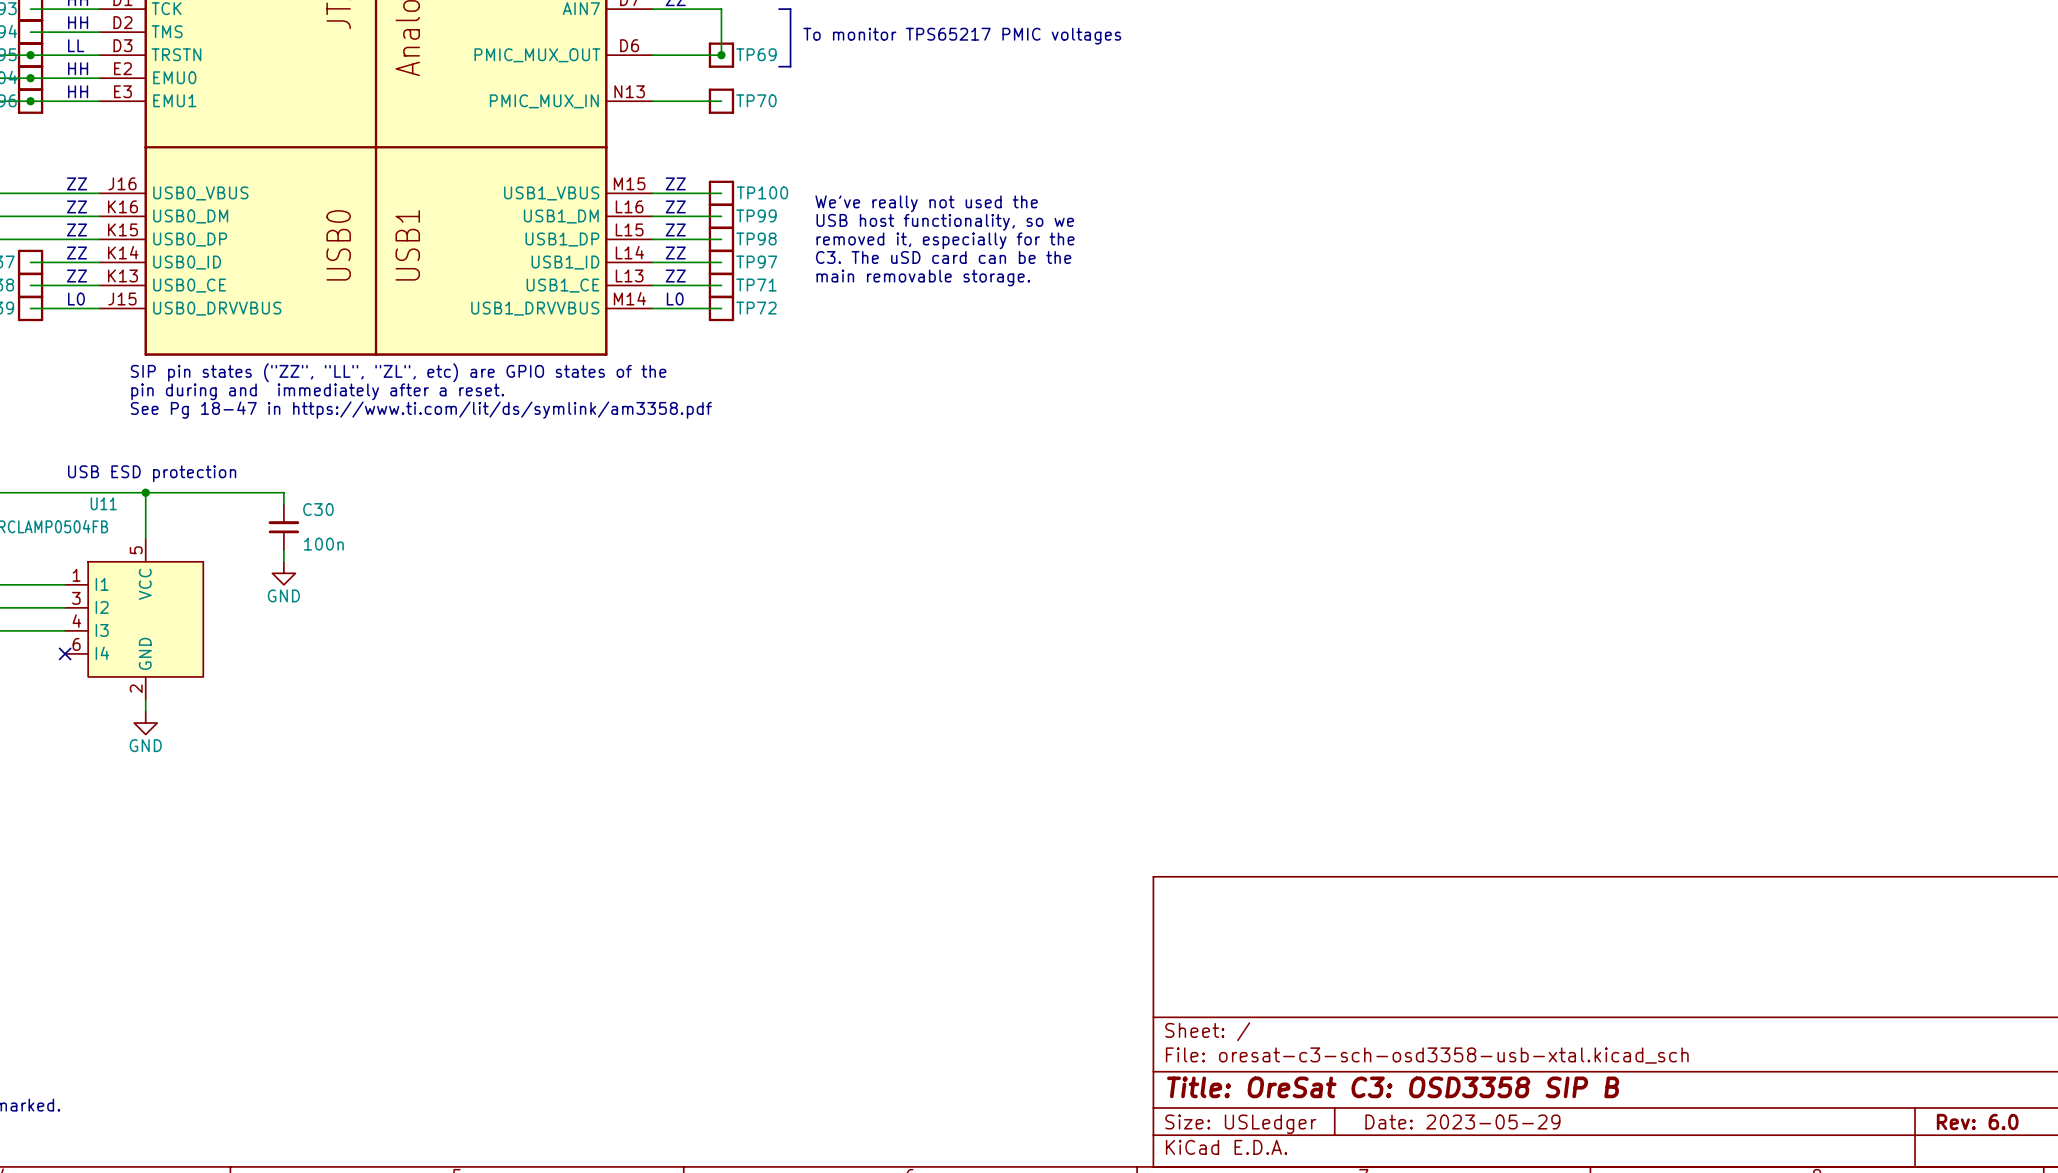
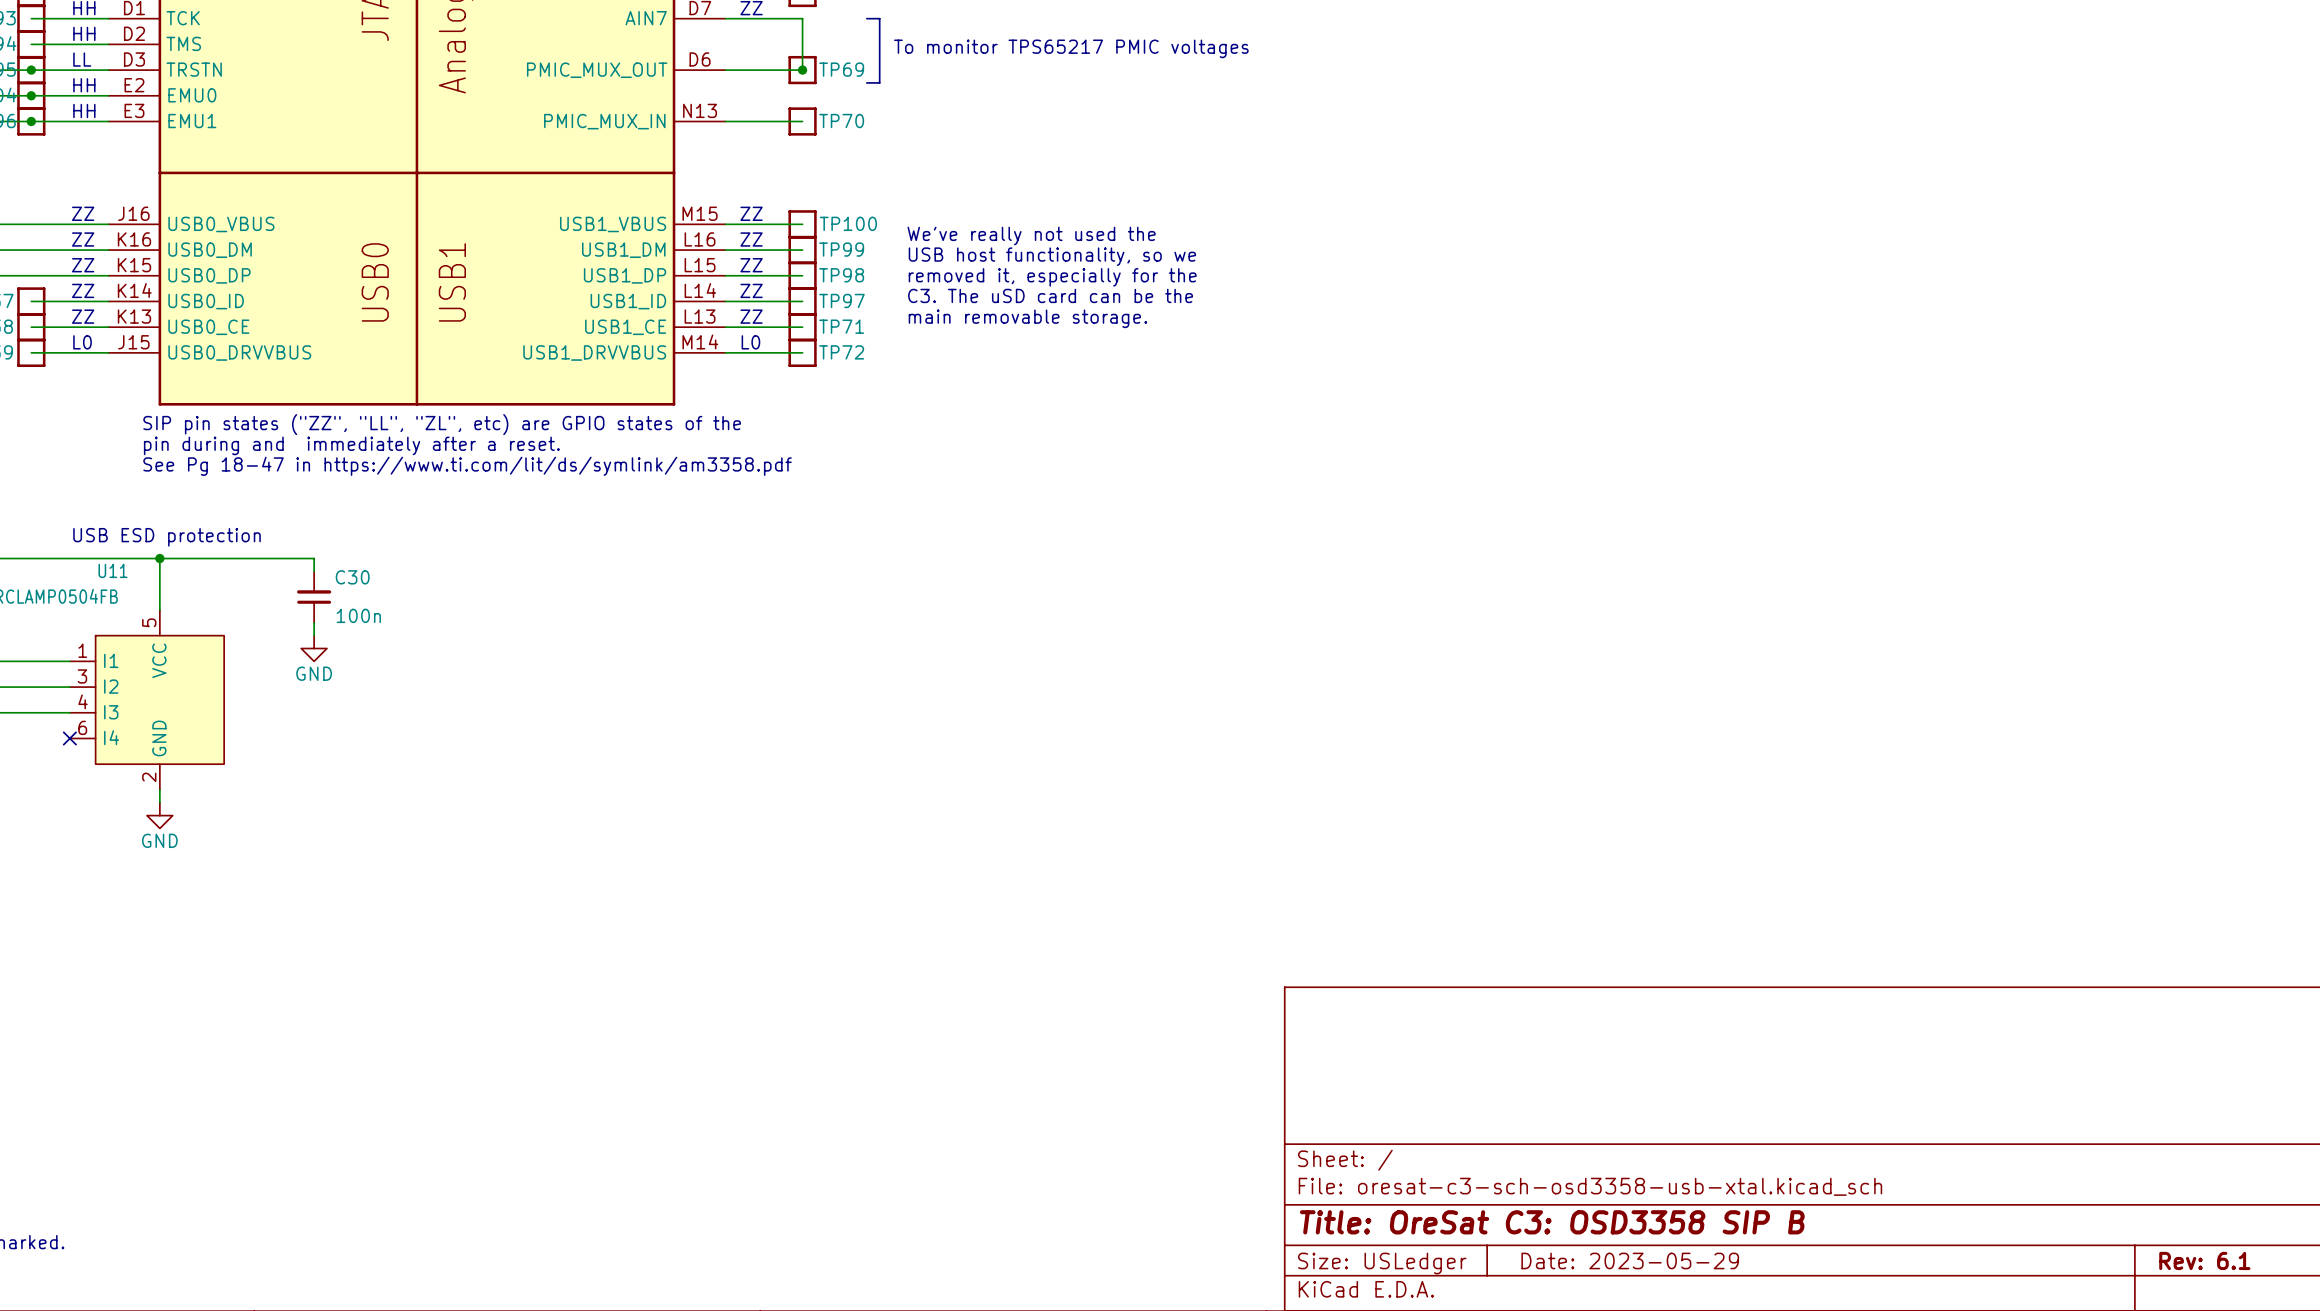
title block: Rev: 6.0 (1977, 1121) -> Rev: 6.1 (2204, 1260)

